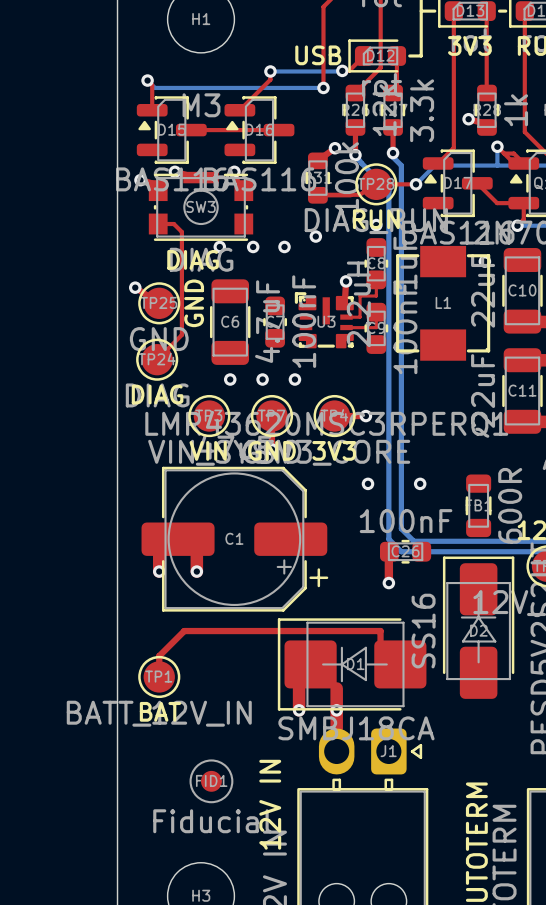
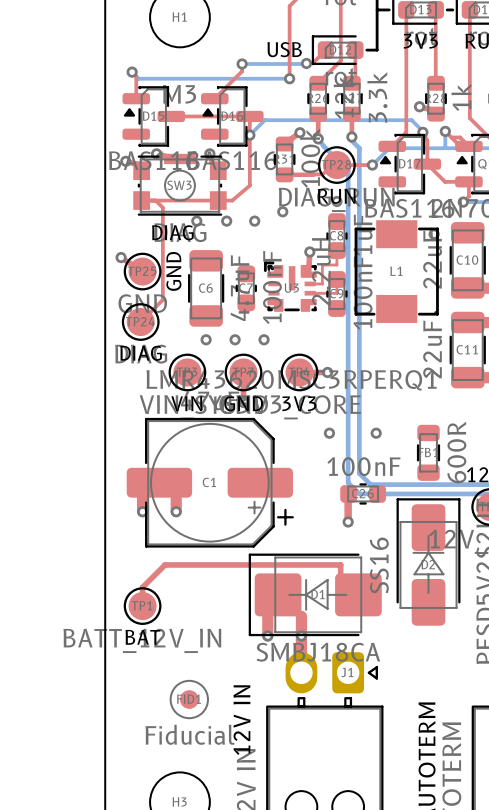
top track: none -> (249, 116) (249, 185) (232, 200) (155, 200)
top track: none -> (422, 132) (427, 140) (427, 161)
bottom track: none -> (422, 132) (411, 120) (264, 120) (249, 135)
via: none -> (422, 132)
via: none -> (249, 135)

